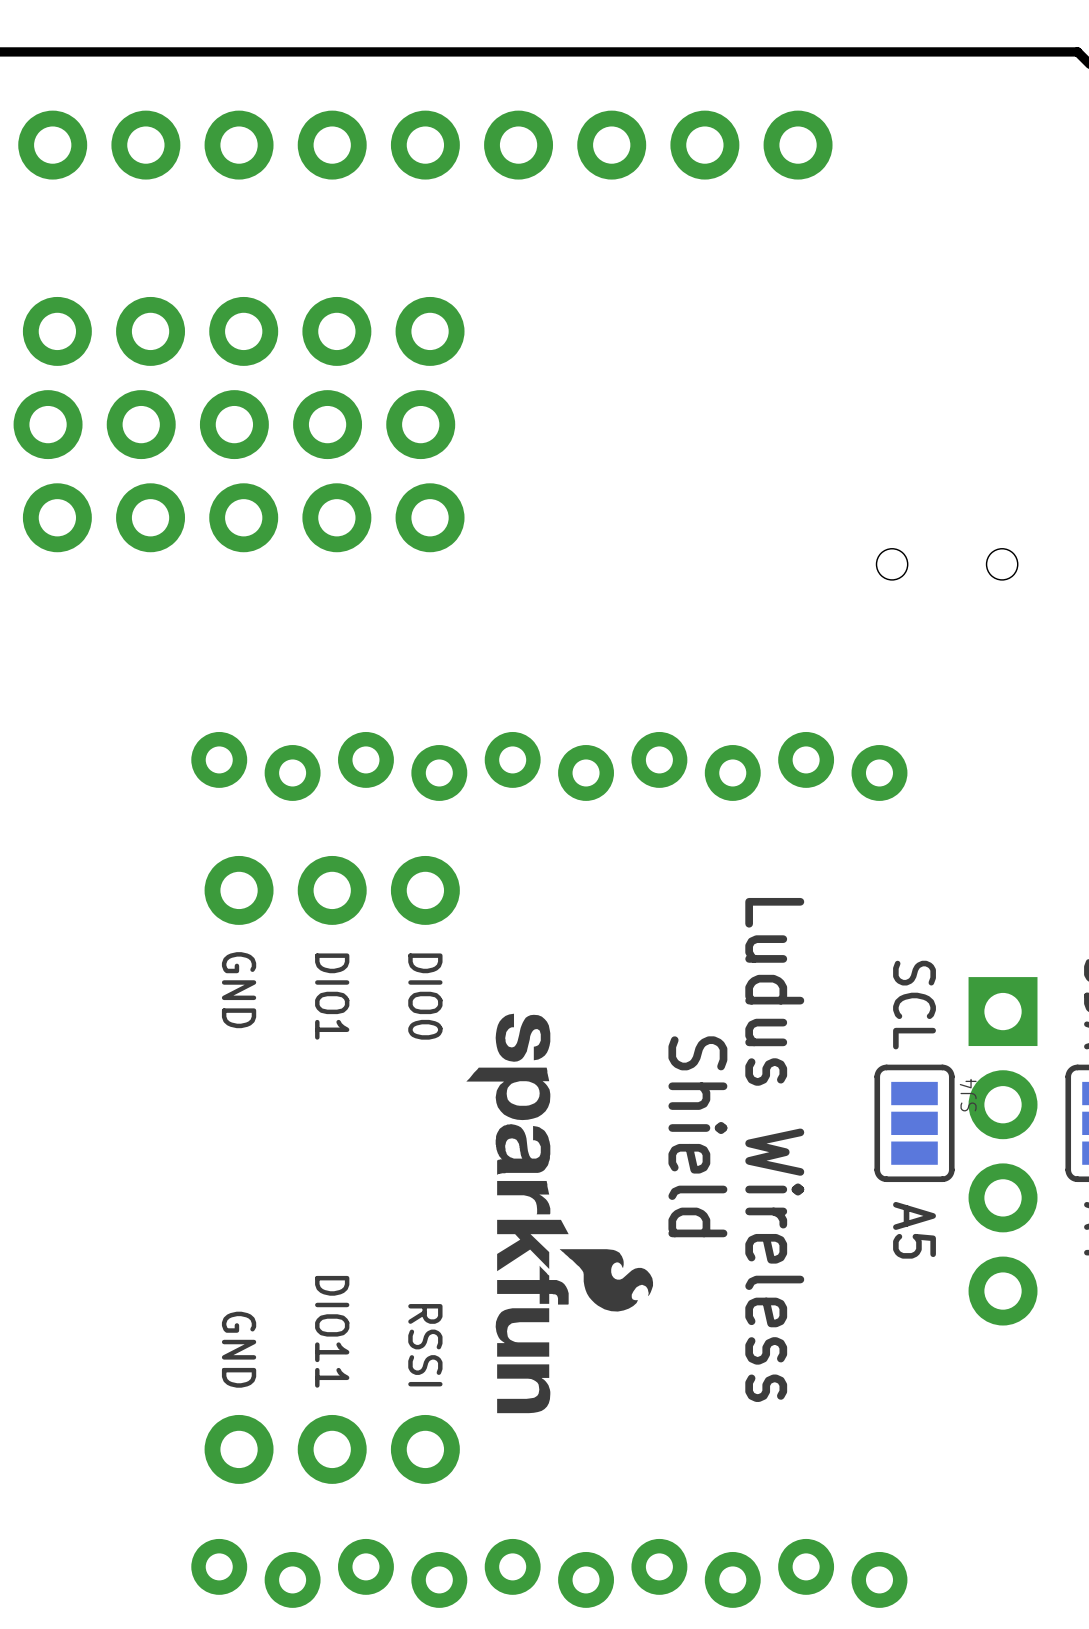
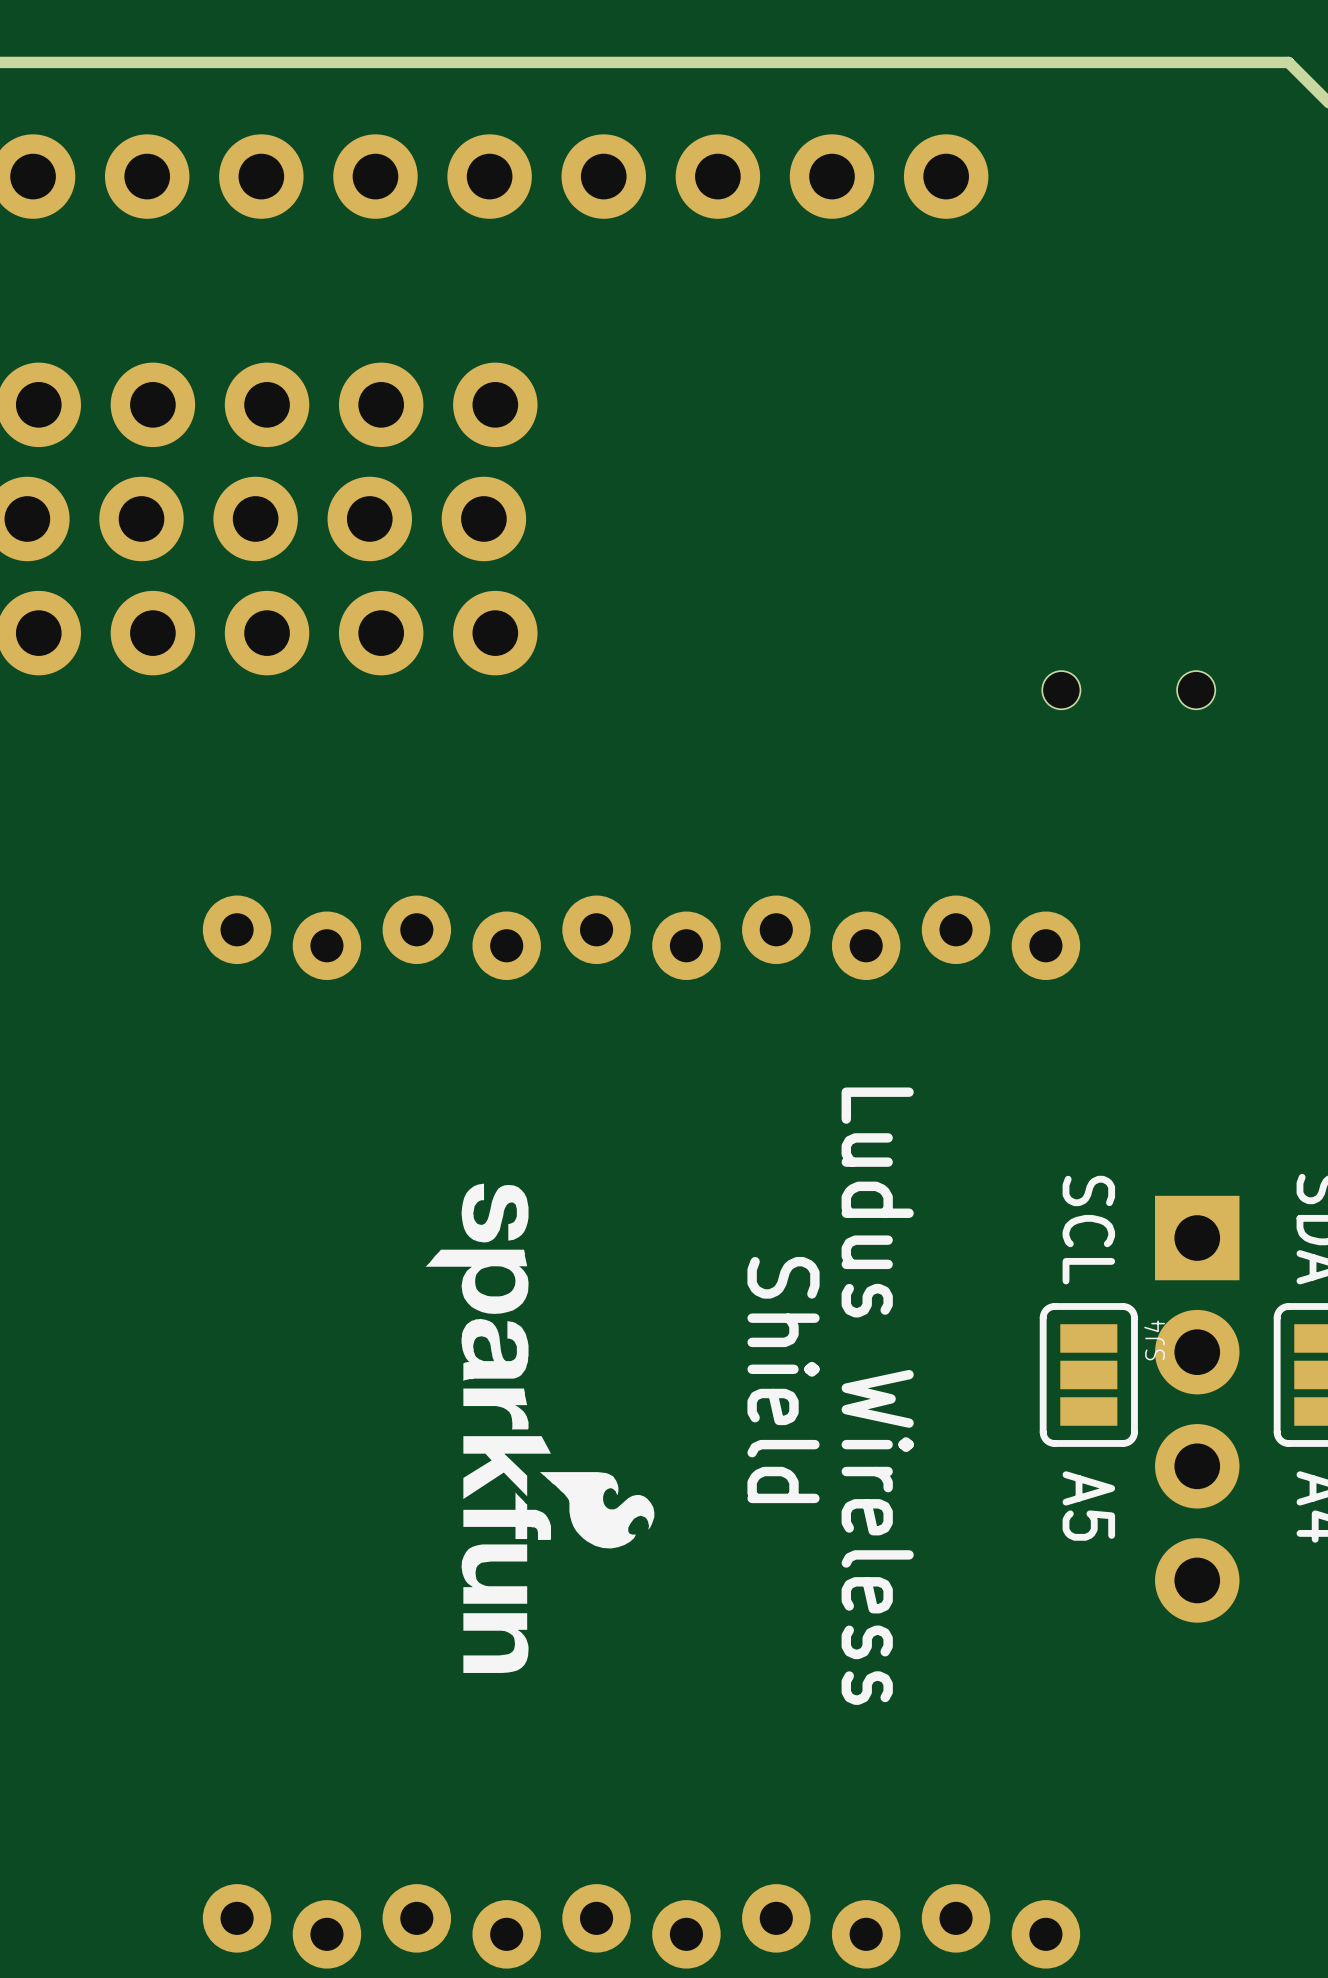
part: (332, 890) -> none
text: GND (239, 990) -> none
text: DIO1 (332, 996) -> none
text: DIO0 (425, 996) -> none
text position: Shield (697, 1136) -> Shield (783, 1380)
text position: Ludus Wireless (774, 1149) -> Ludus Wireless (877, 1396)
drawing position: (559, 1213) -> (539, 1428)
text: DIO11 (332, 1331) -> none
text: RSSI (425, 1345) -> none
text: GND (239, 1349) -> none
part: (332, 1449) -> none

